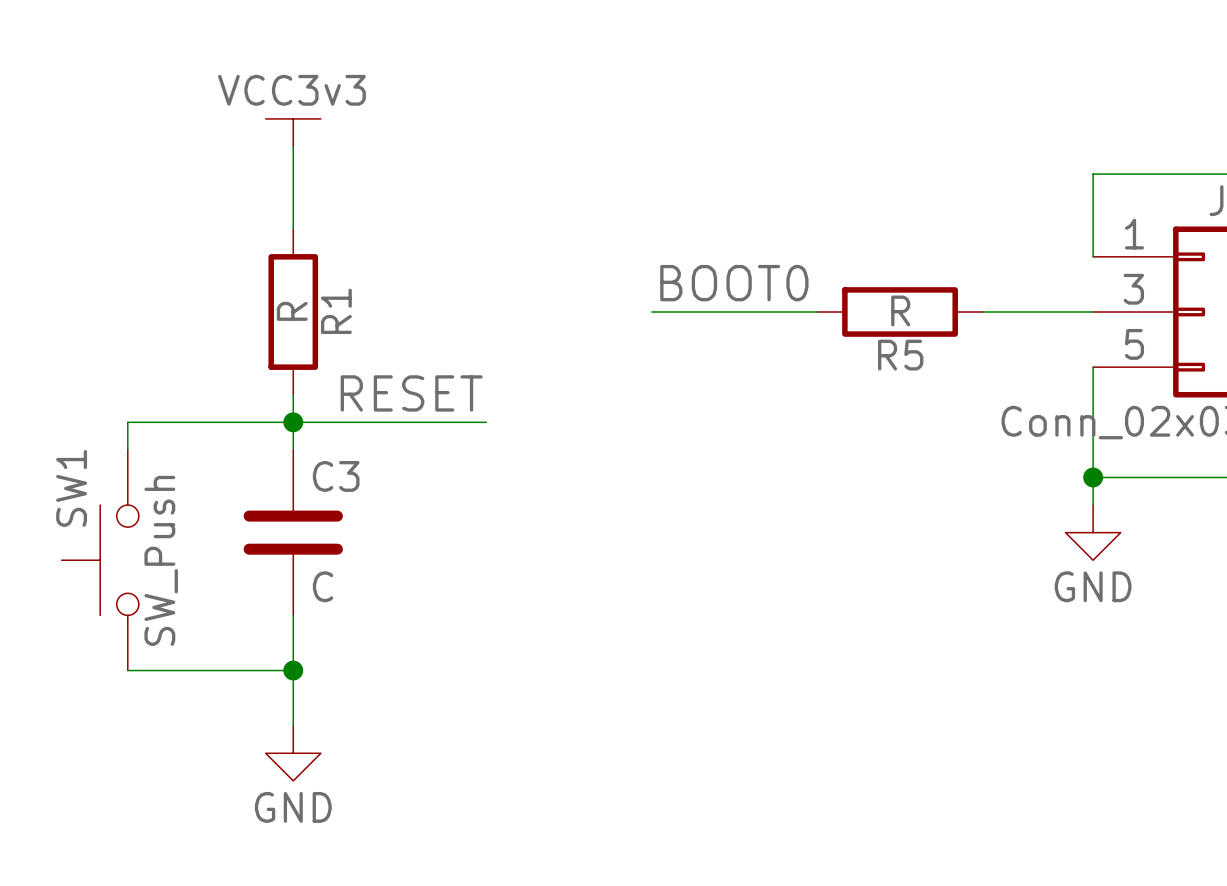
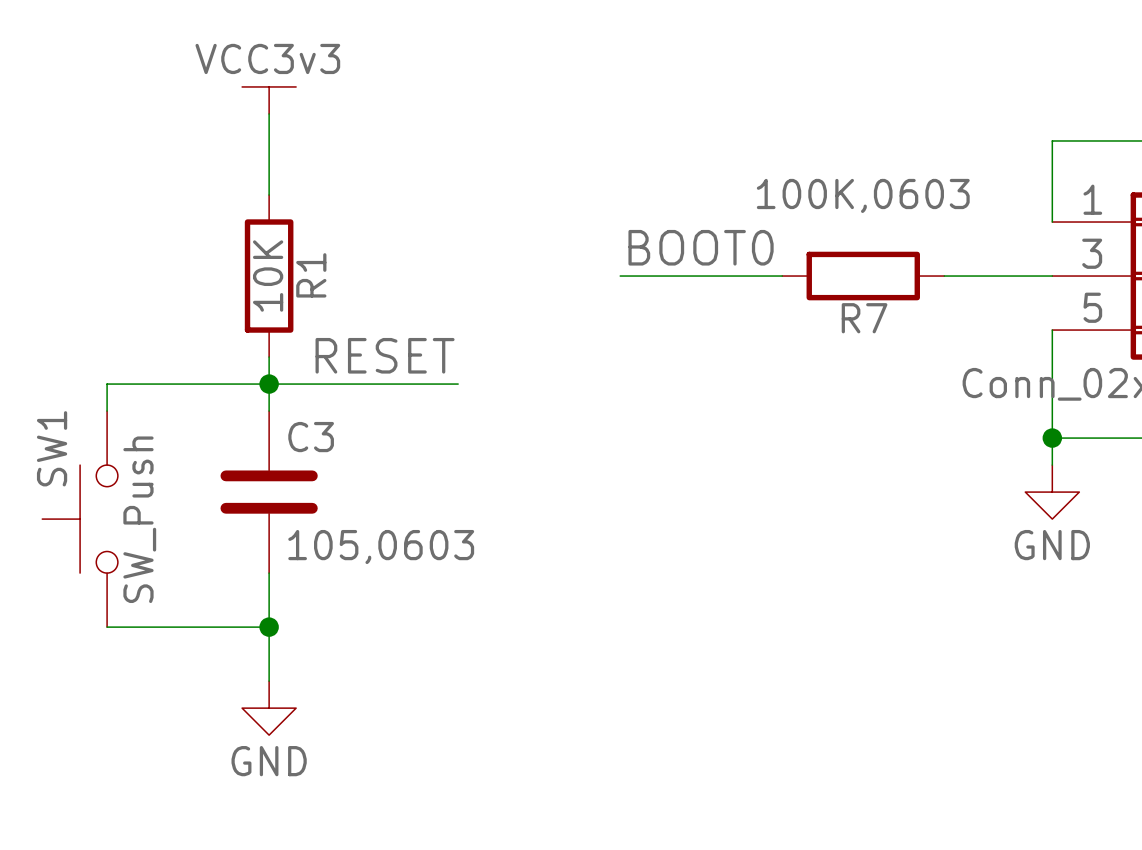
R5 value: R (900, 310) -> 100K,0603 (863, 195)
R1 value: R (292, 311) -> 10K (268, 276)
R5 name: R5 (900, 355) -> R7 (864, 318)
C3 value: C (323, 586) -> 105,0603 (381, 547)

